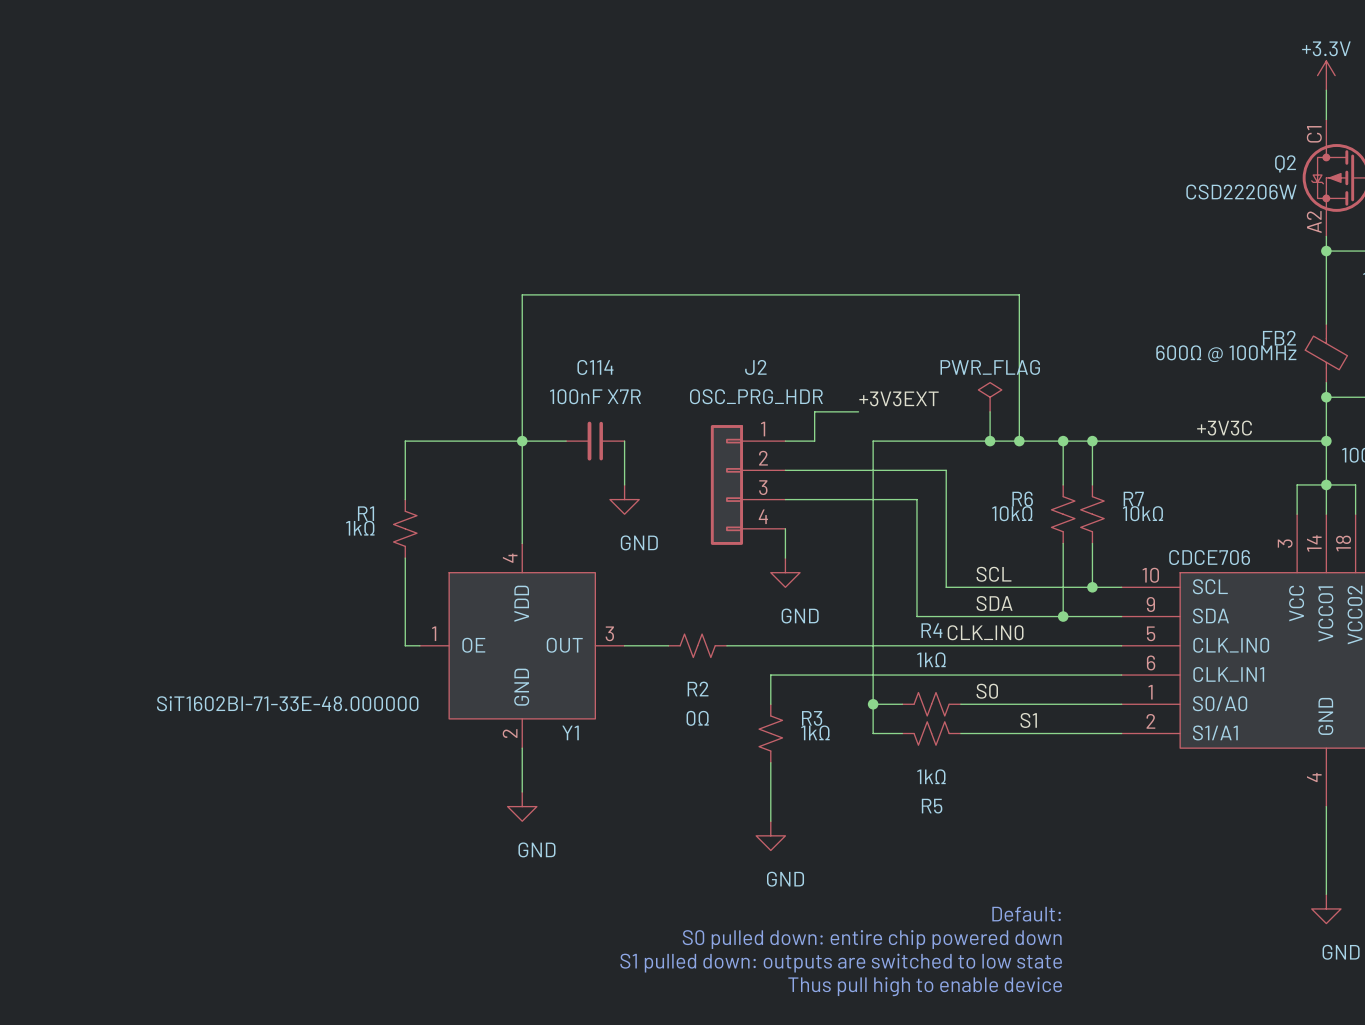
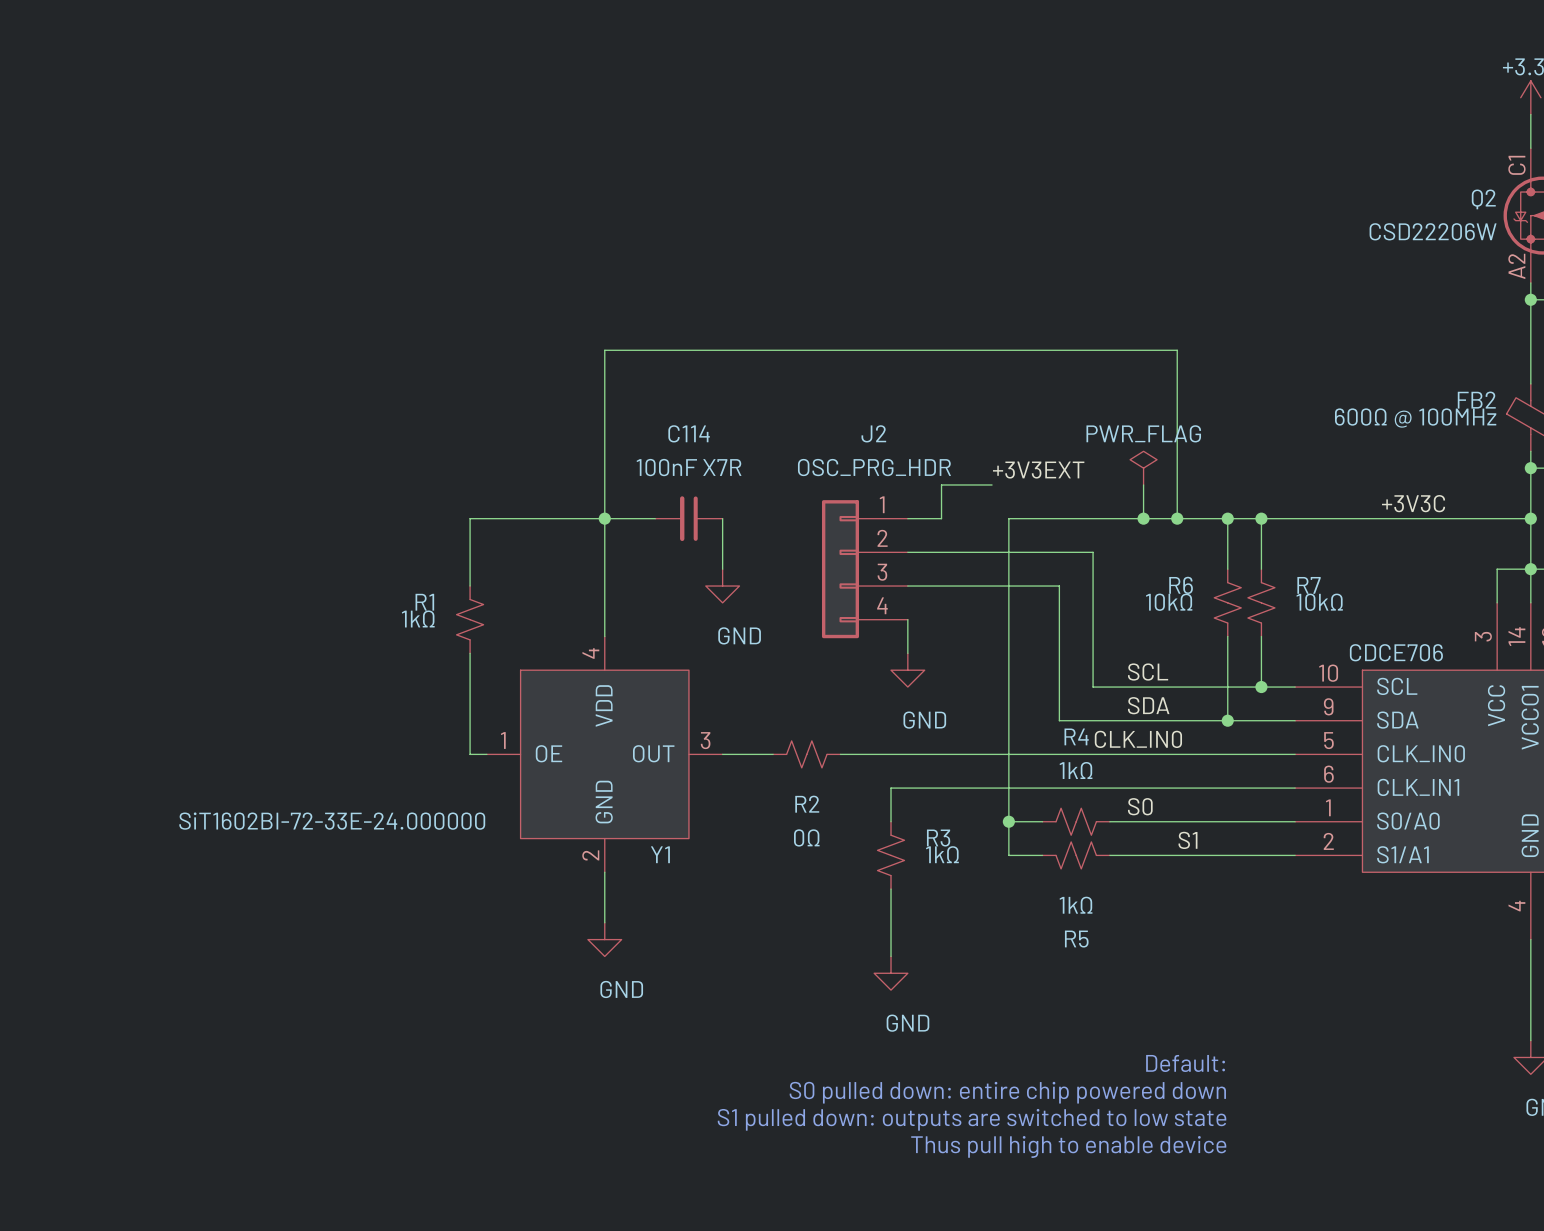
Y1 value: SiT1602BI-71-33E-48.000000 (287, 703) -> SiT1602BI-72-33E-24.000000 (332, 821)

